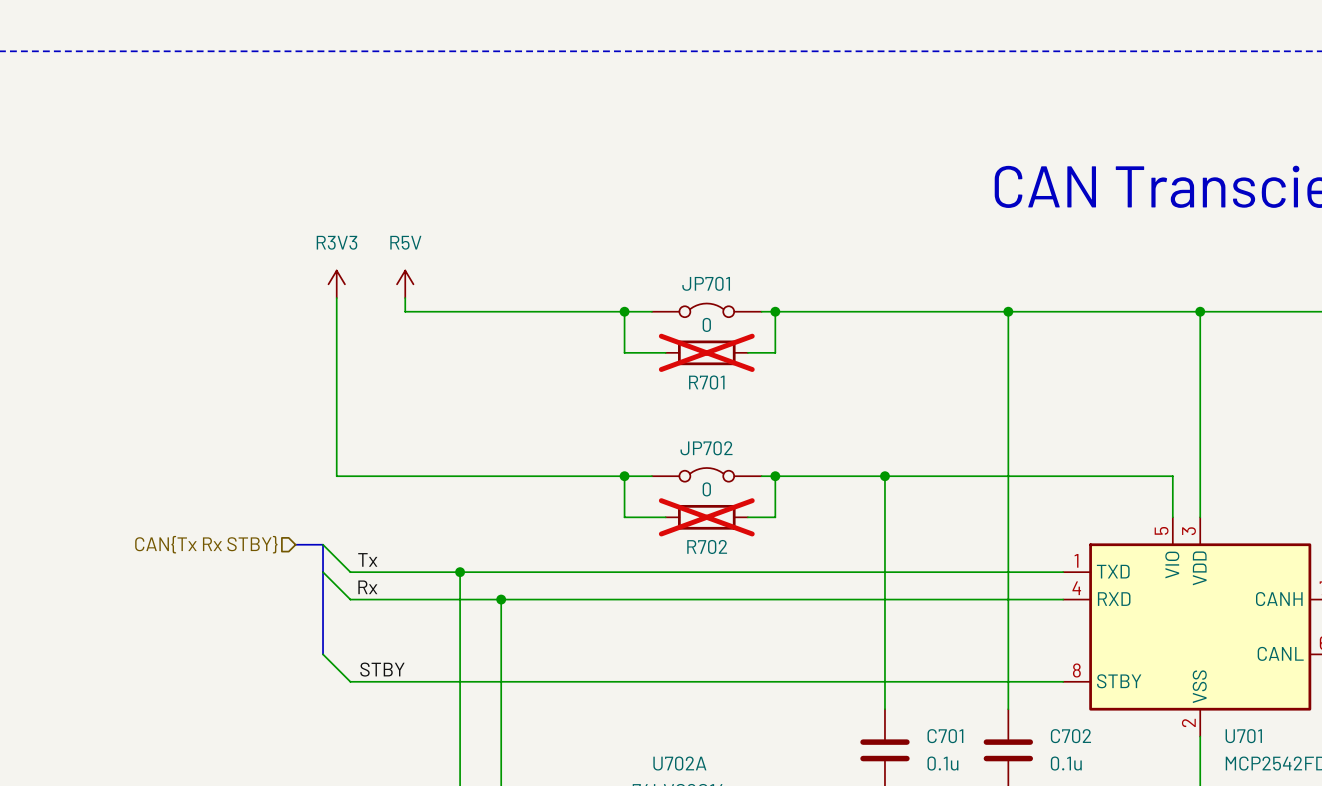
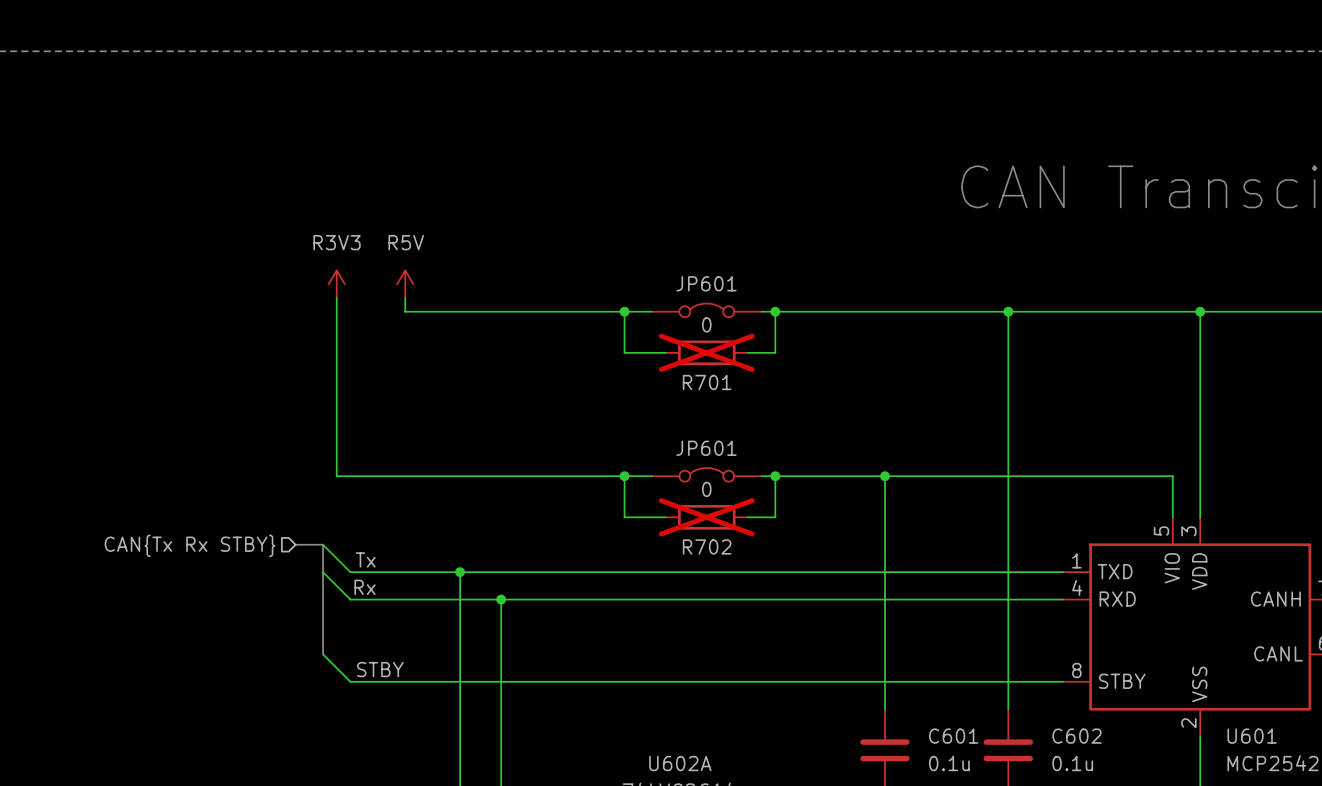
JP701 name: JP701 (706, 283) -> JP601 (706, 283)
JP702 name: JP702 (706, 448) -> JP601 (706, 448)
C701 name: C701 (945, 736) -> C601 (953, 736)
C702 name: C702 (1070, 736) -> C602 (1076, 736)
U701 name: U701 (1243, 736) -> U601 (1252, 736)
U702A name: U702A (679, 763) -> U602A (680, 763)

